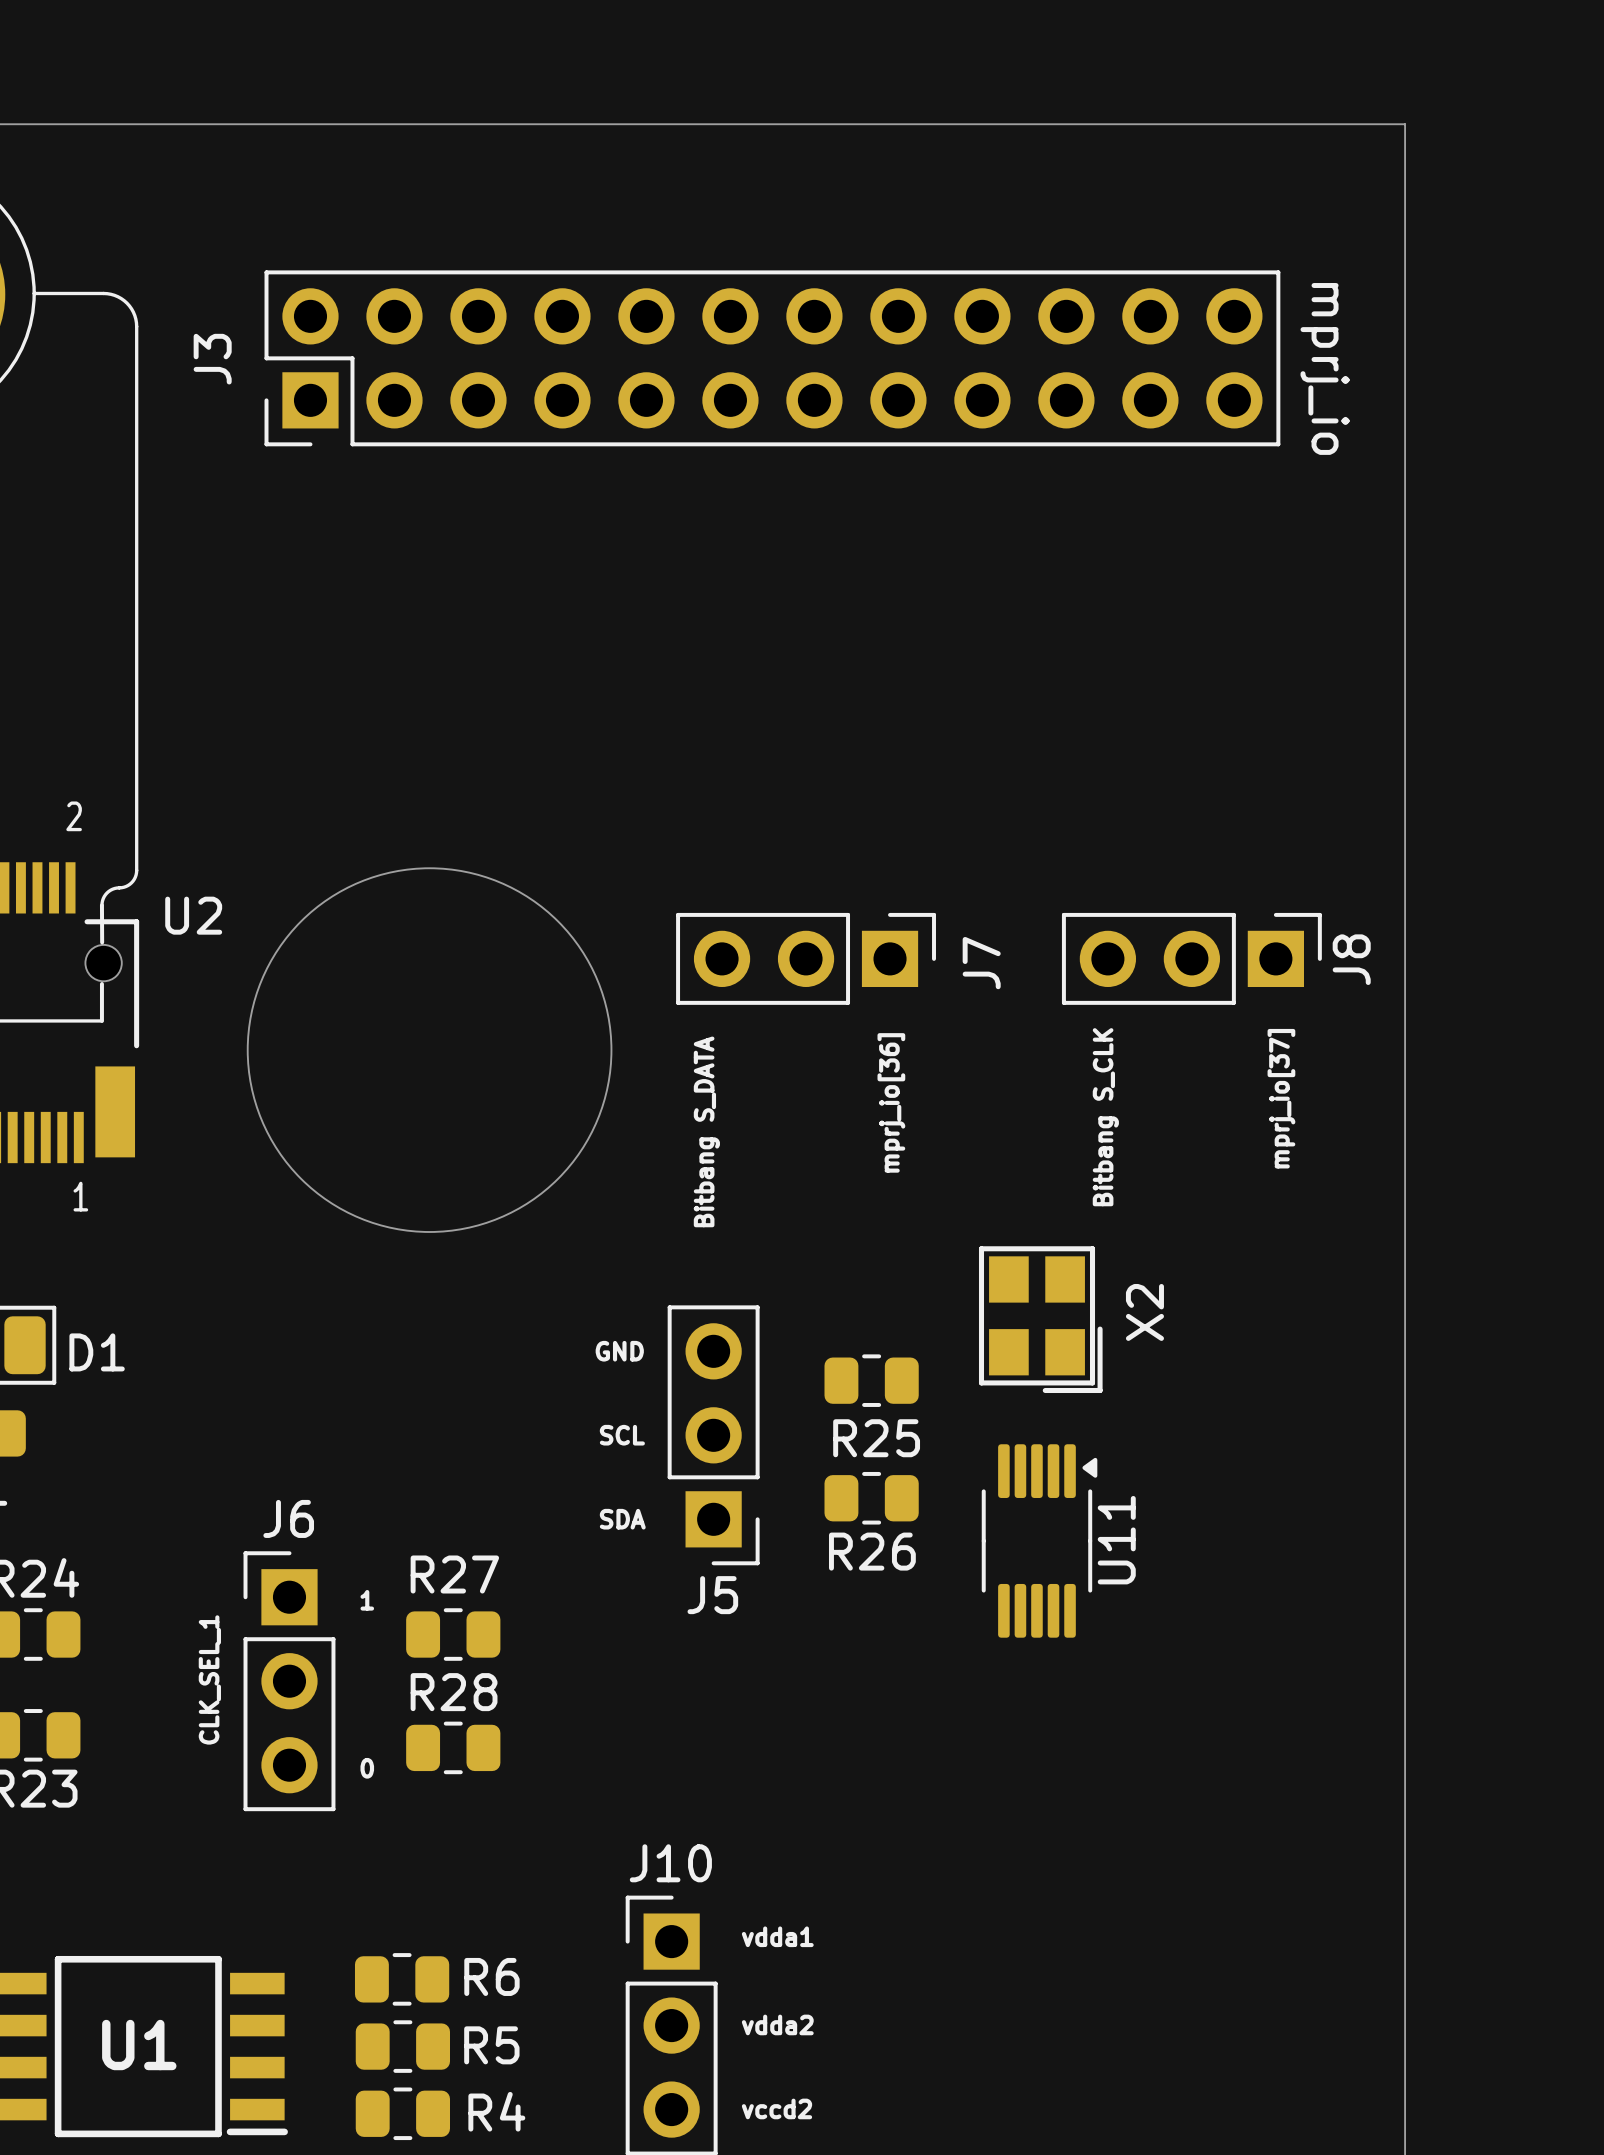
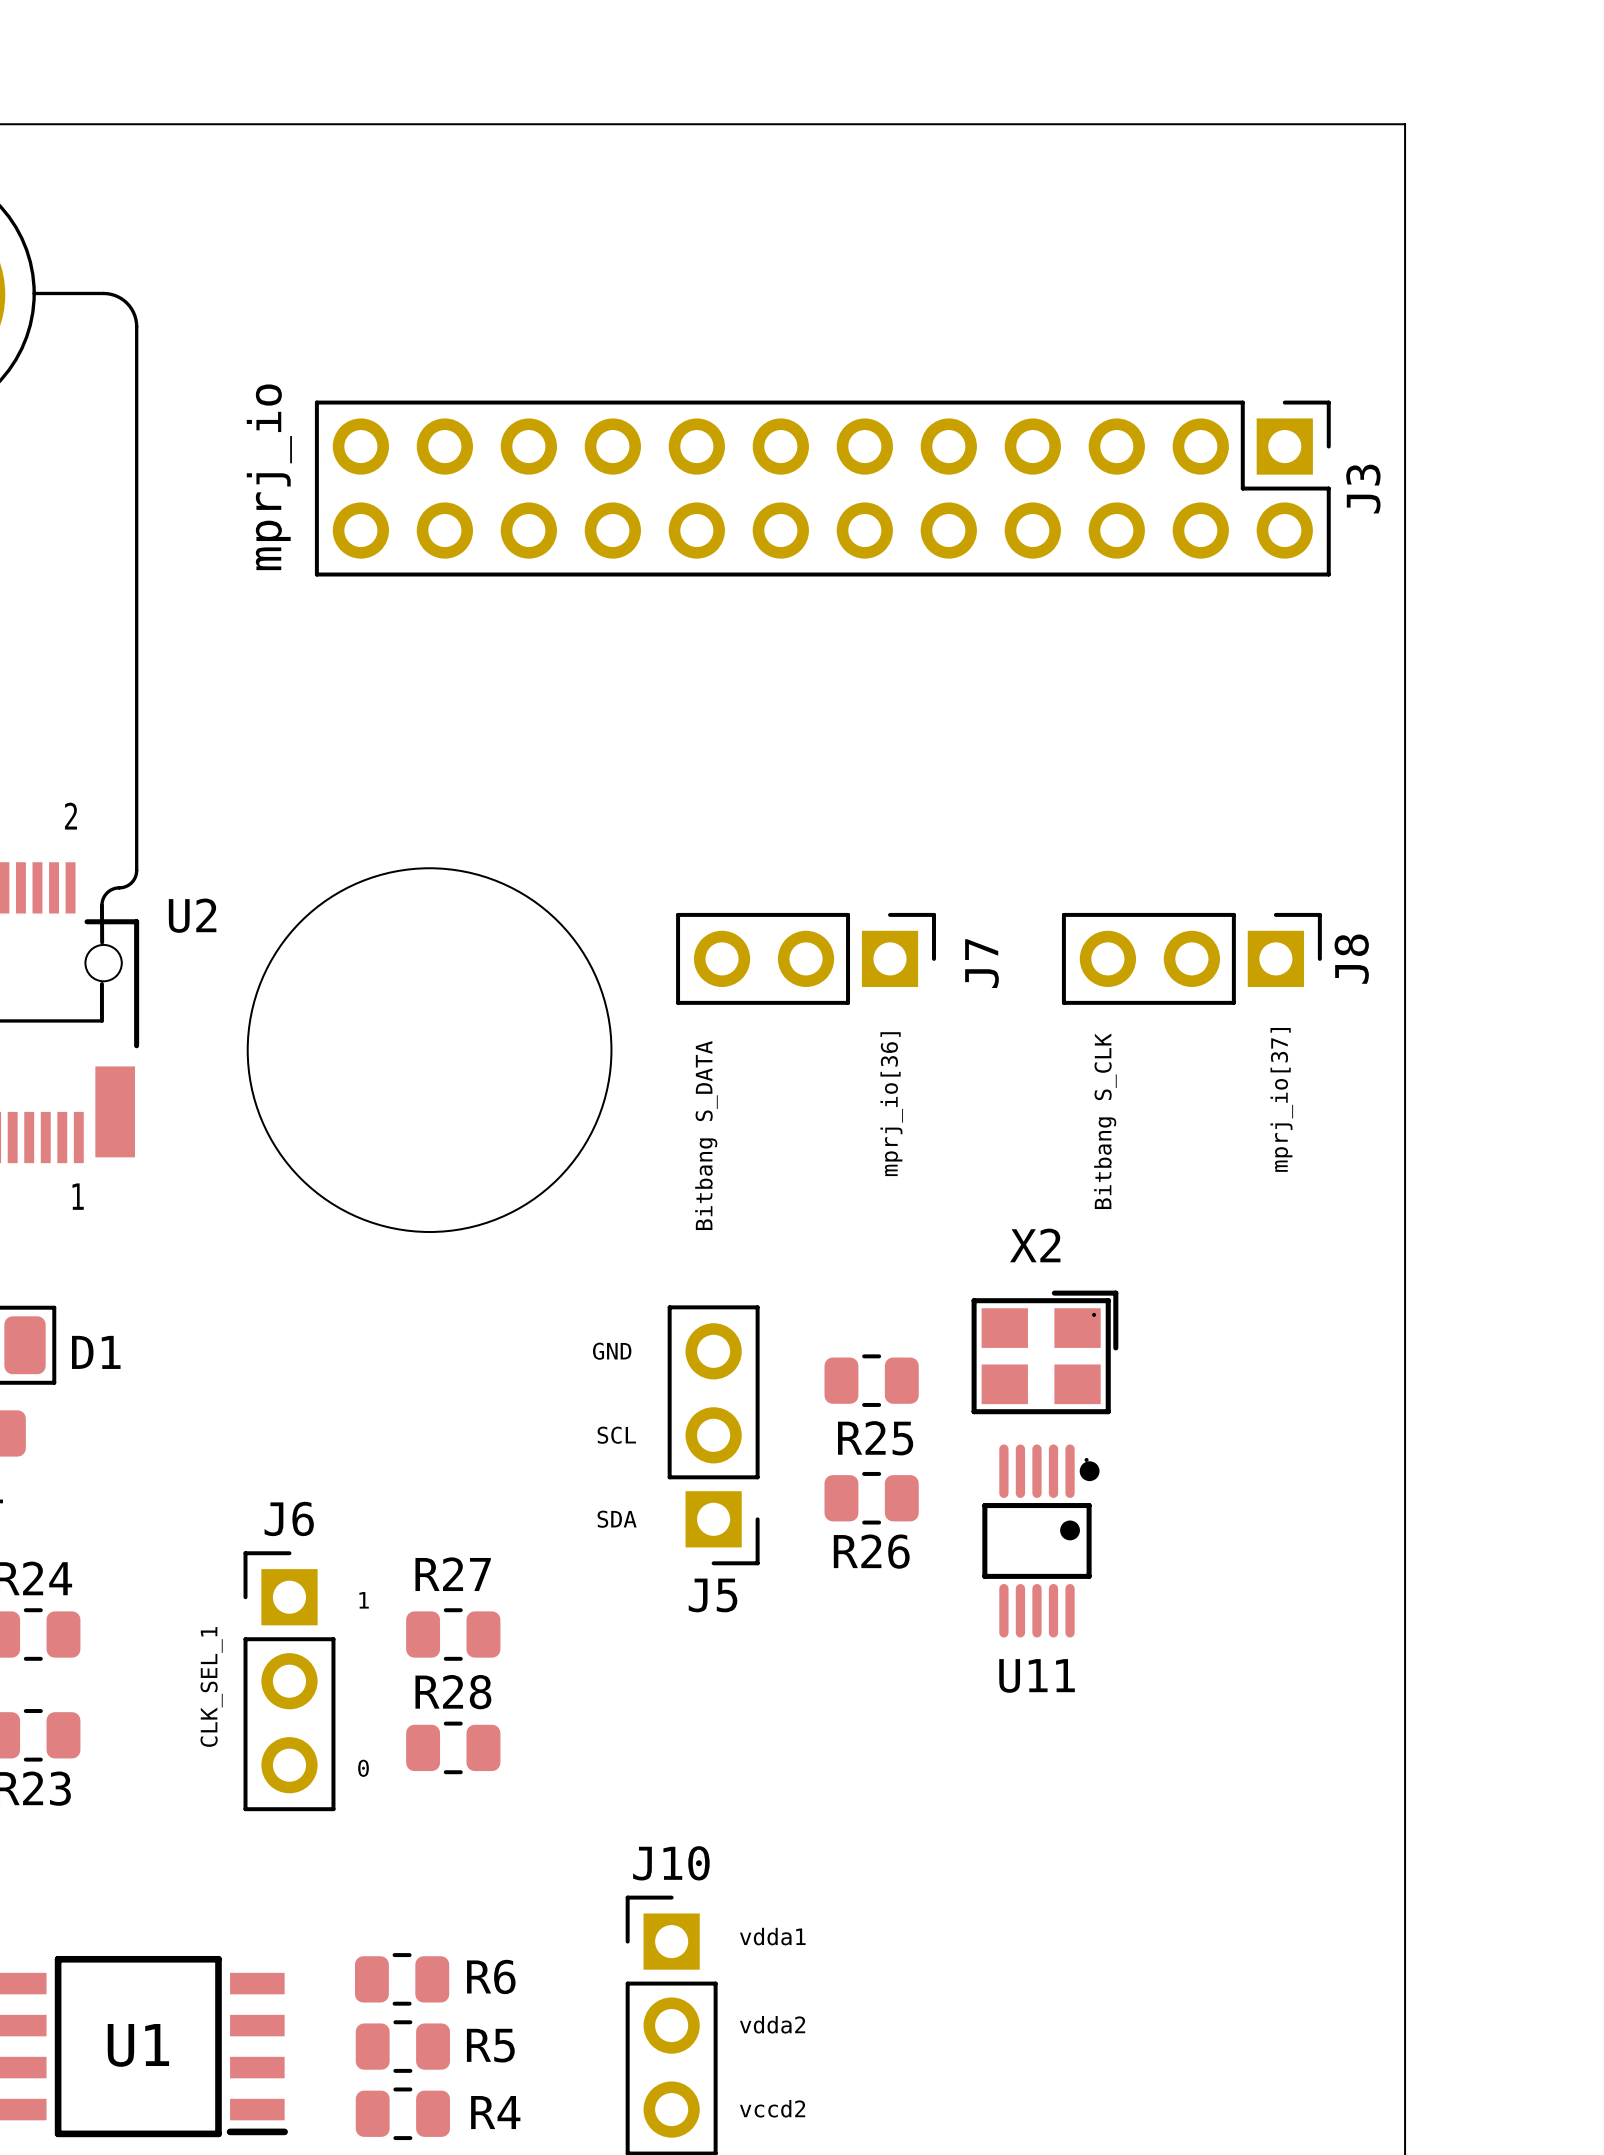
J3 rotation: 0° (772, 358) -> 180° (822, 488)
text: mprj_io (1325, 368) -> none
text: none -> mprj_io (269, 477)
X2 footprint: [978, 1246, 1103, 1394] -> [971, 1290, 1119, 1415]
X2 name position: X2 (1144, 1312) -> X2 (1035, 1245)
U11 footprint: [981, 1444, 1098, 1638] -> [982, 1444, 1100, 1638]
U11 name position: U11 (1116, 1540) -> U11 (1037, 1675)

